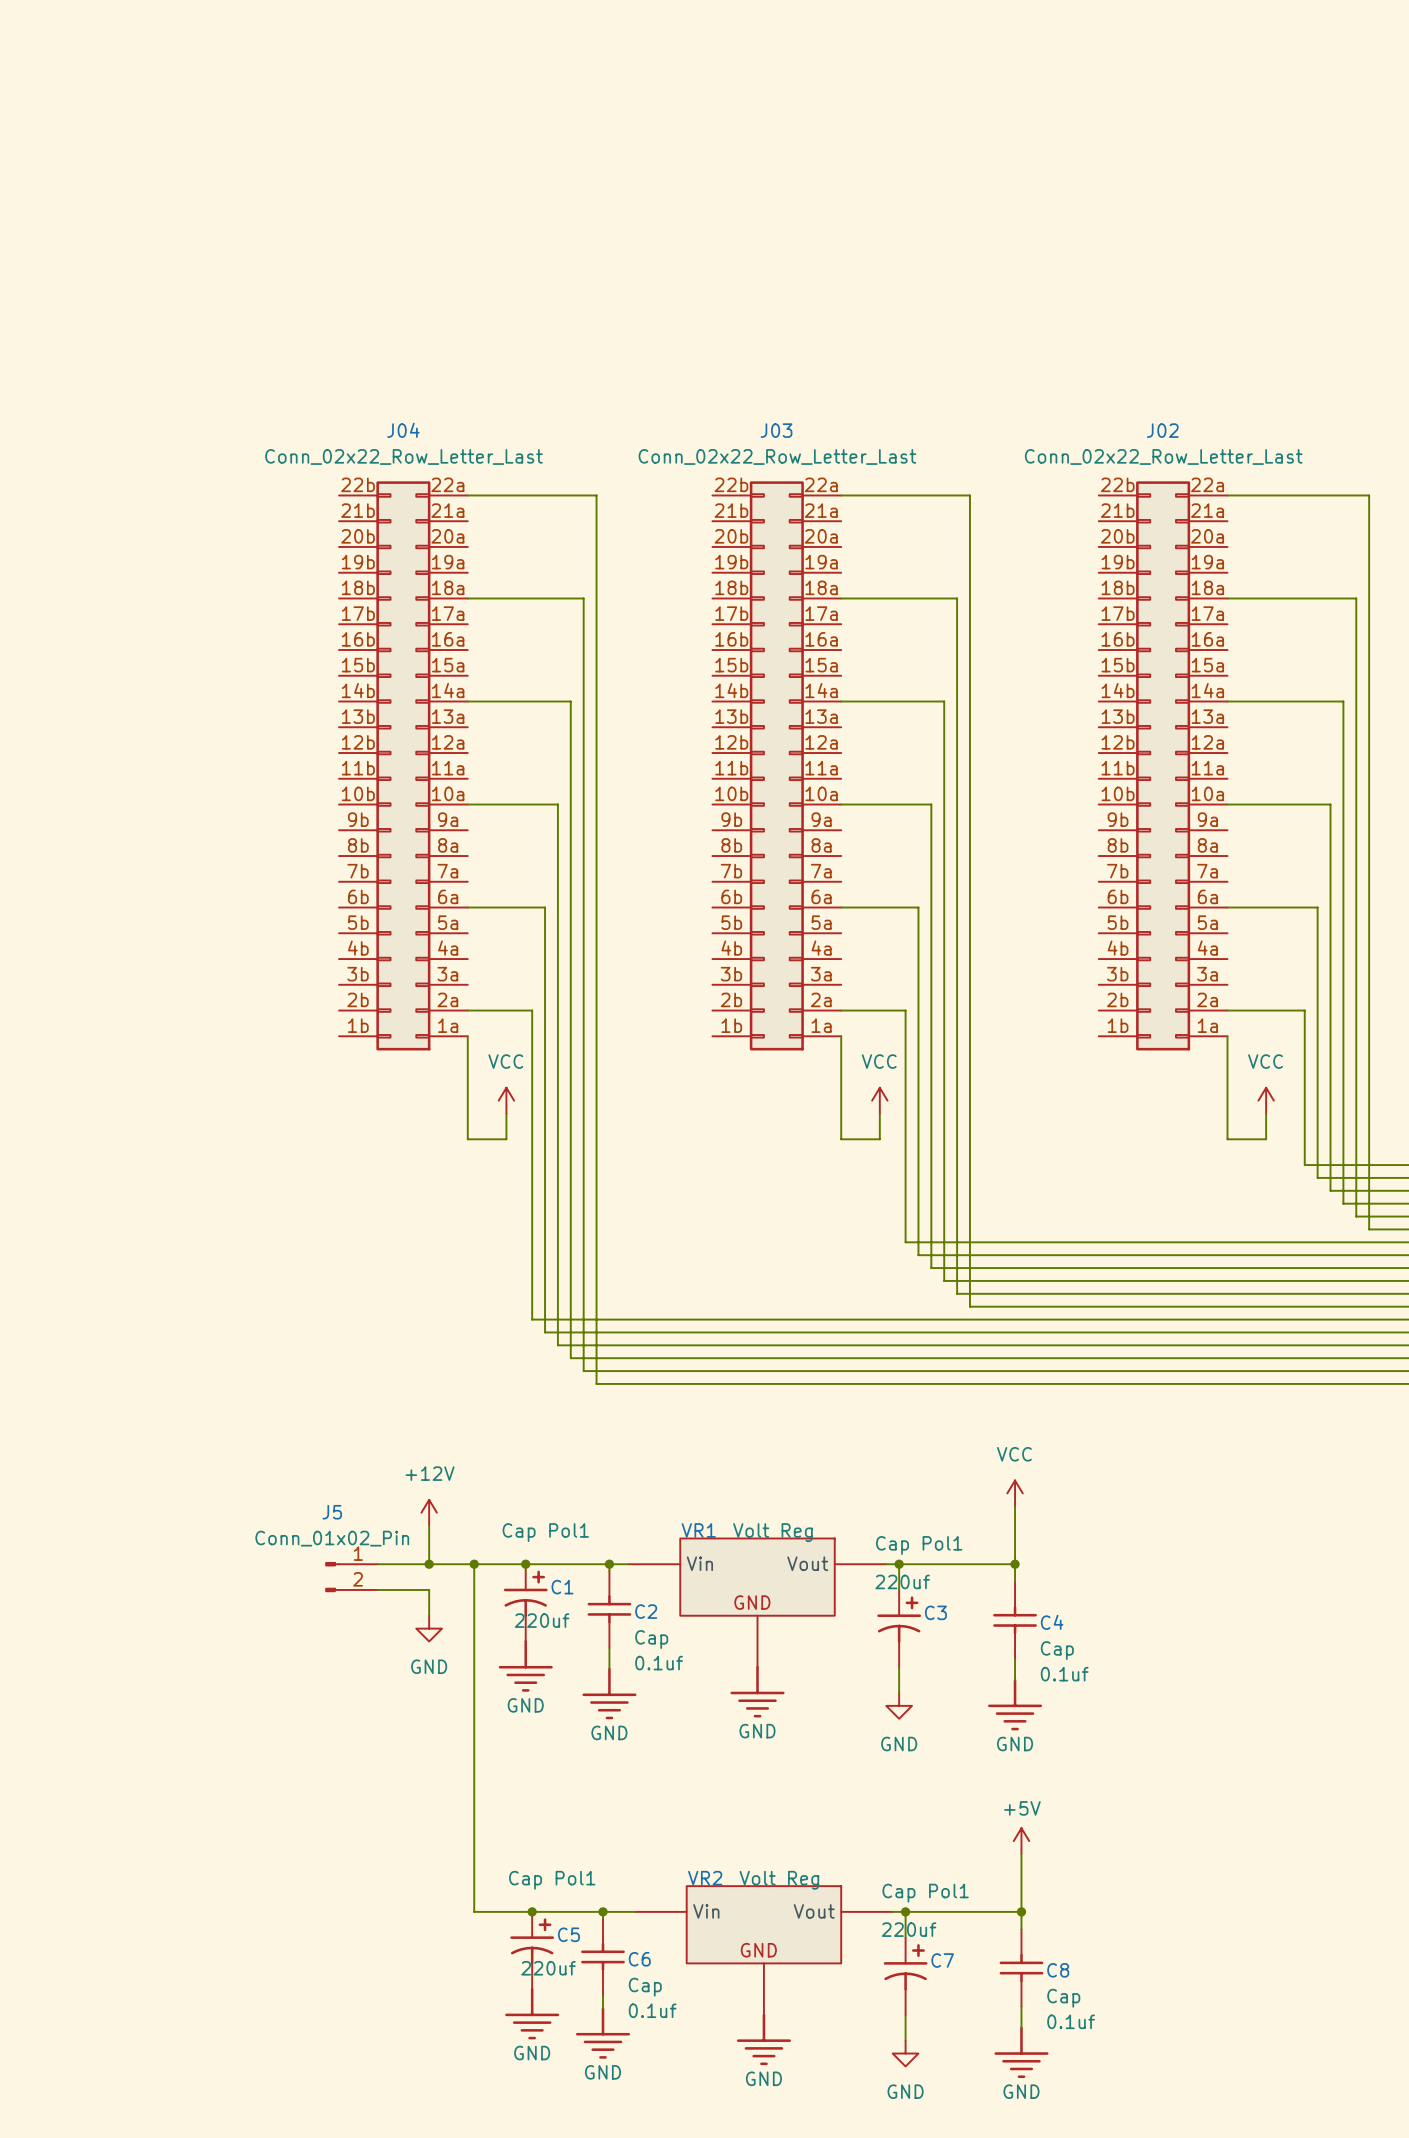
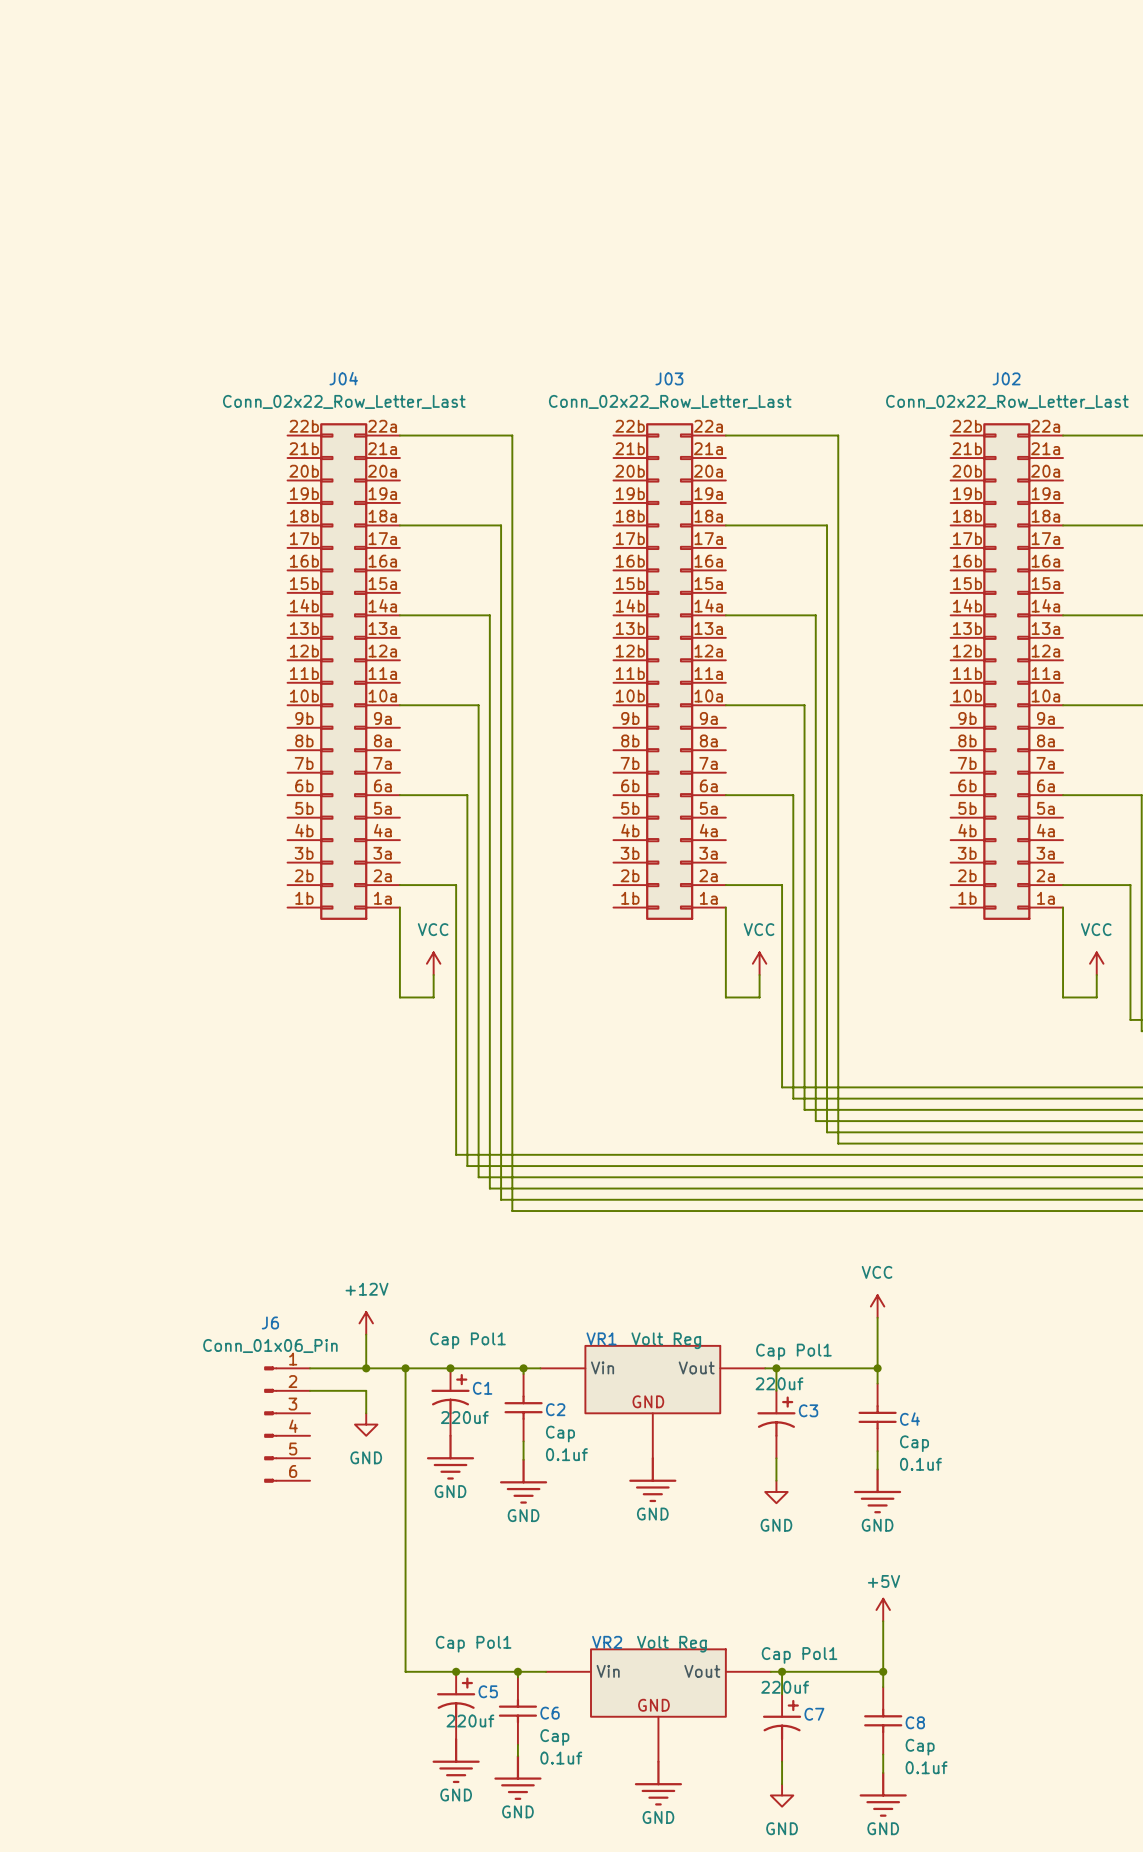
J5: Conn_01x02_Pin (351, 1577) -> none
J6: none -> Conn_01x06_Pin (287, 1424)

